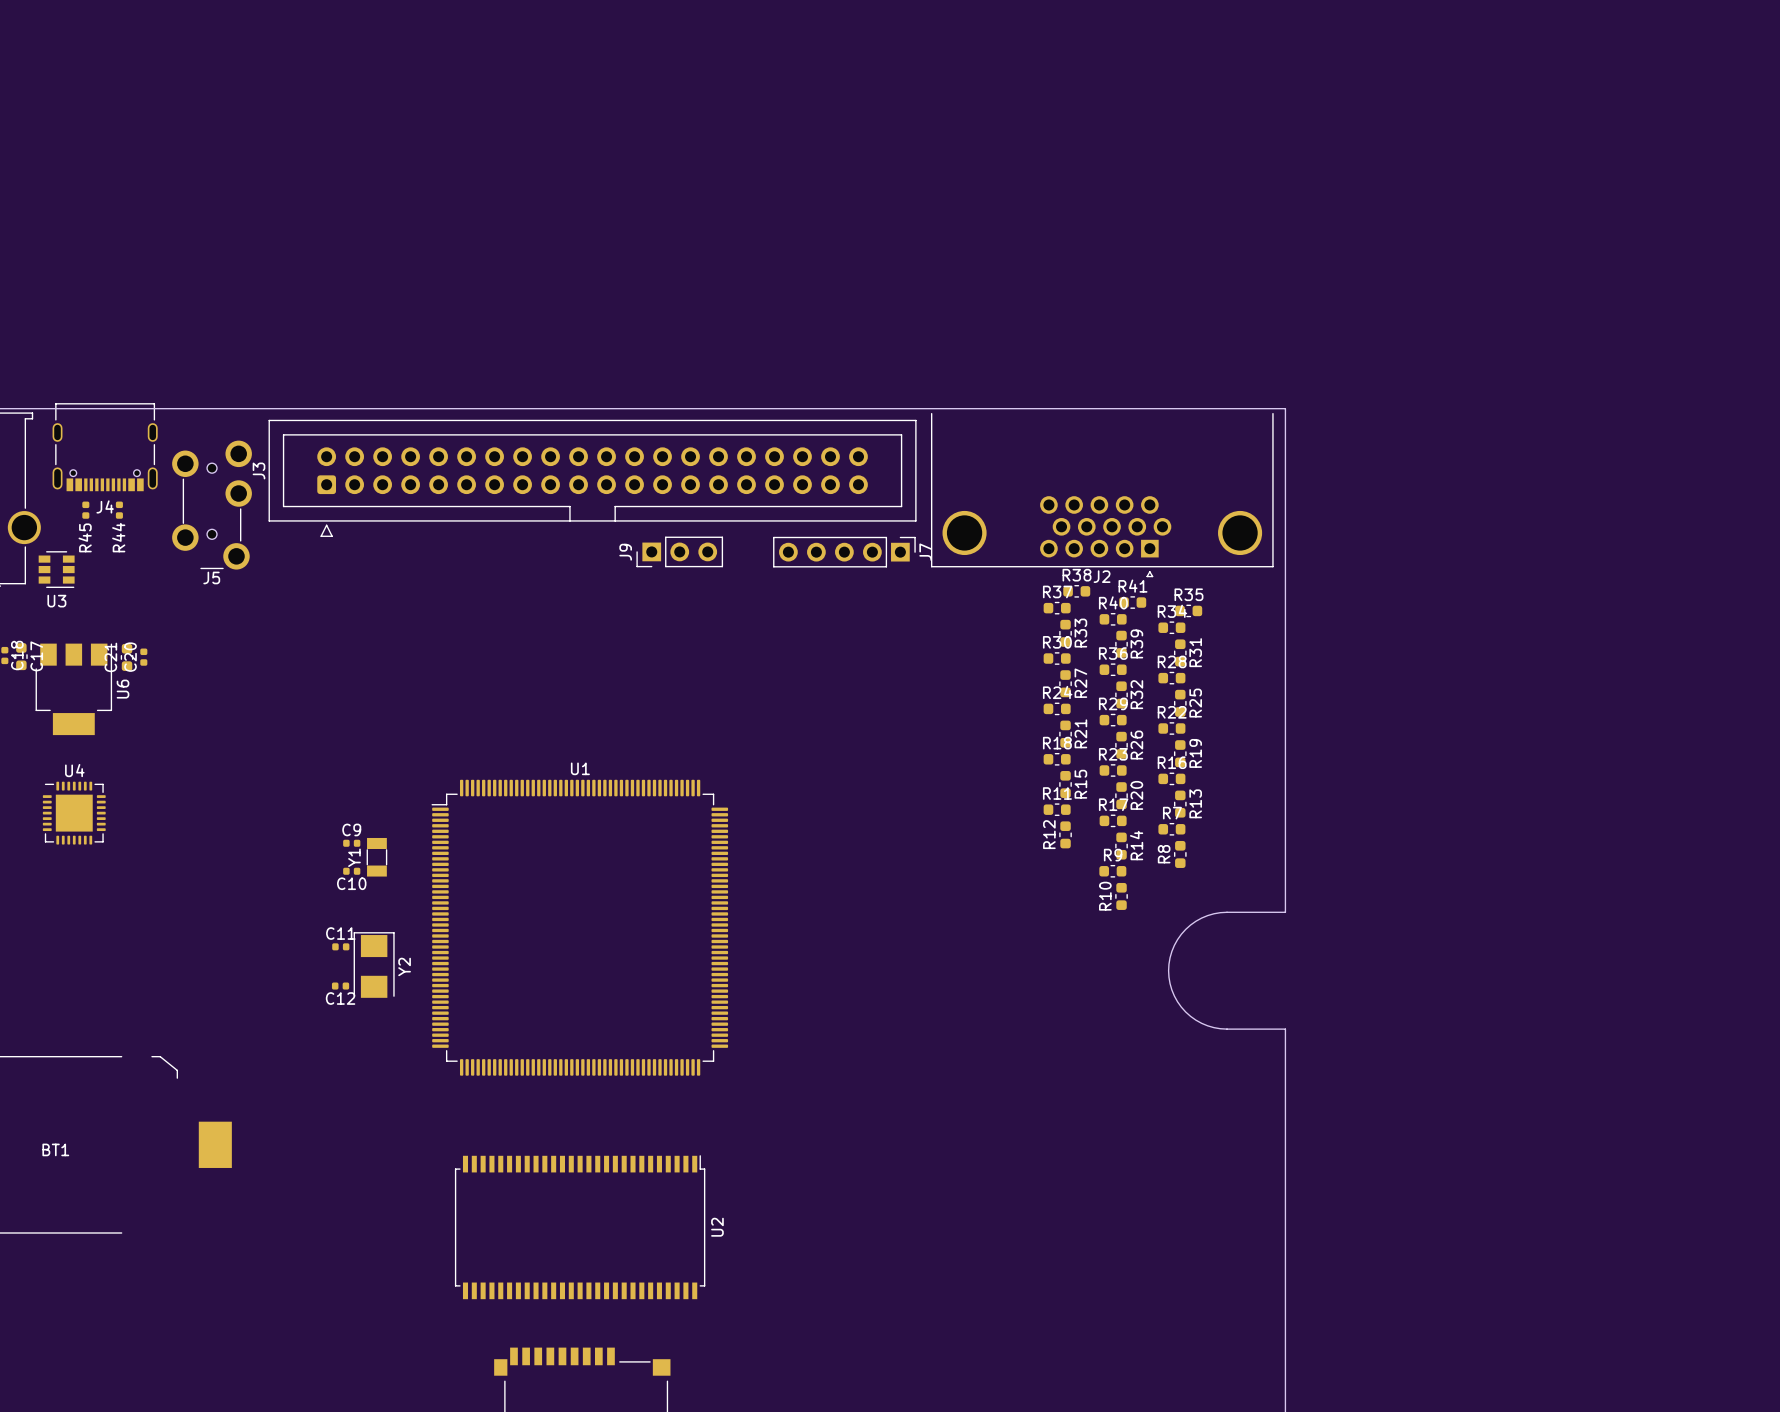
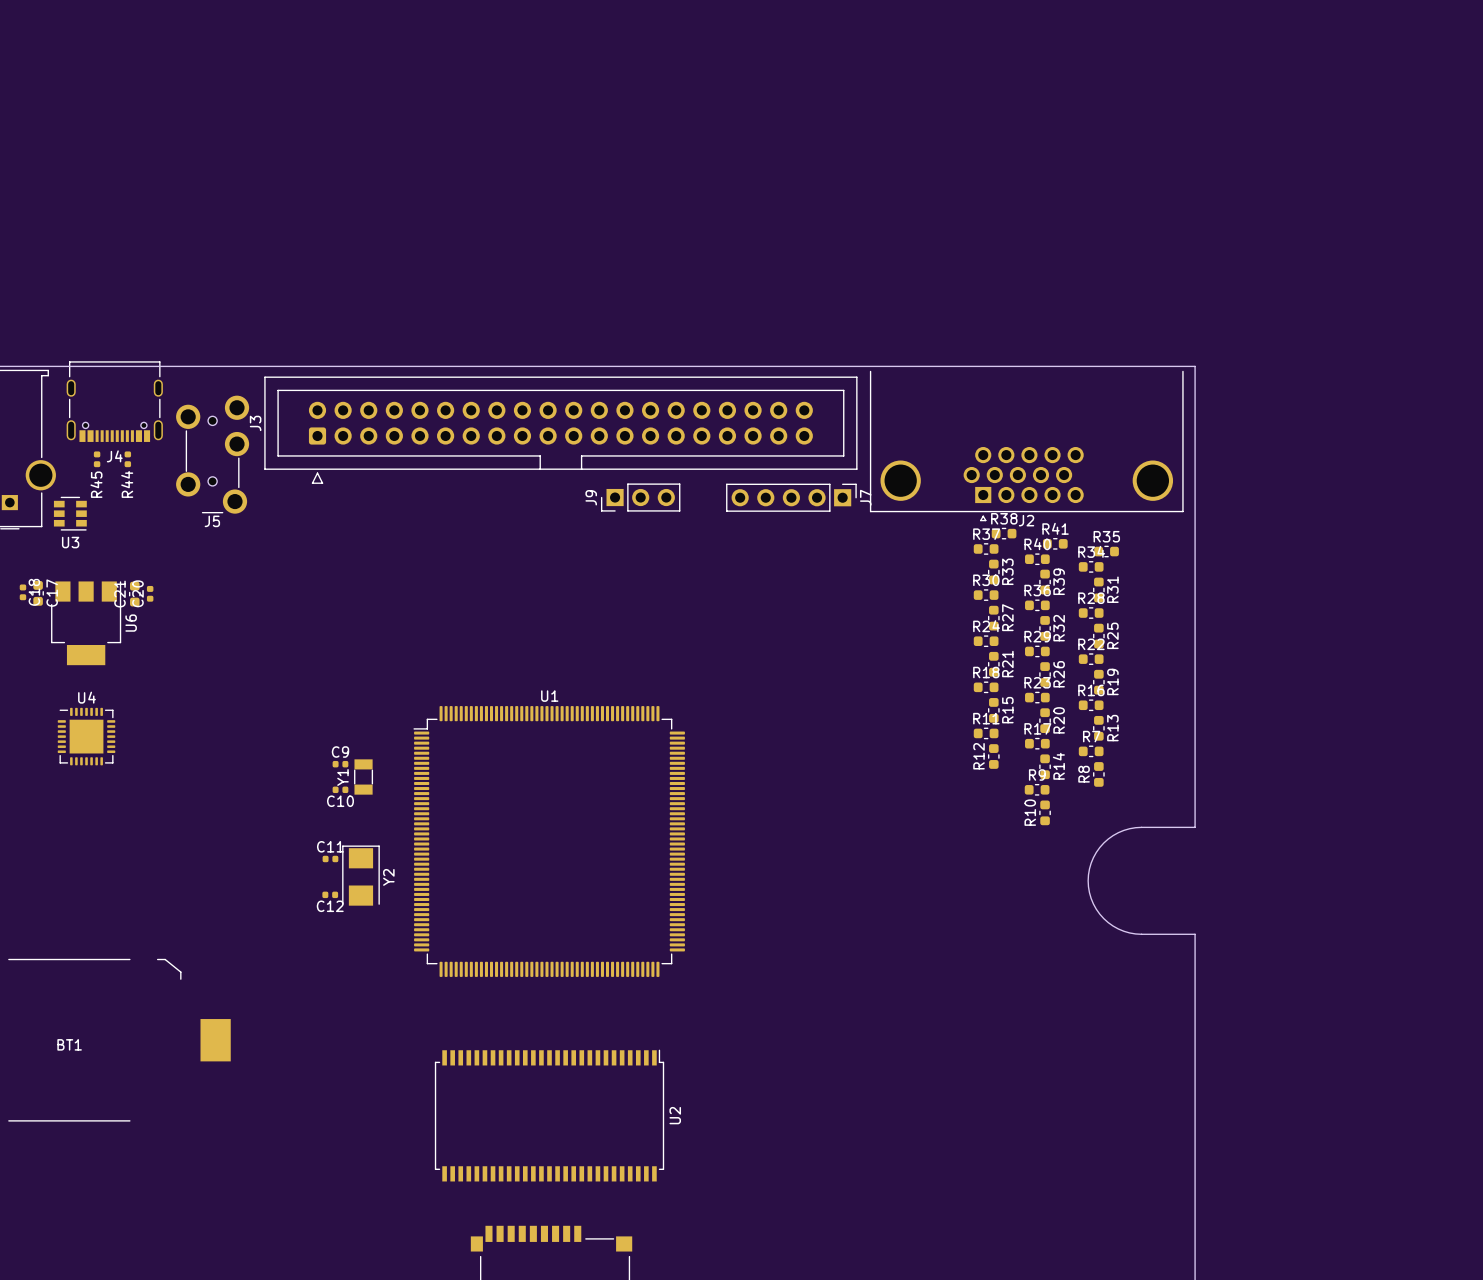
J2 footprint: [931, 412, 1274, 578] -> [869, 370, 1184, 522]

